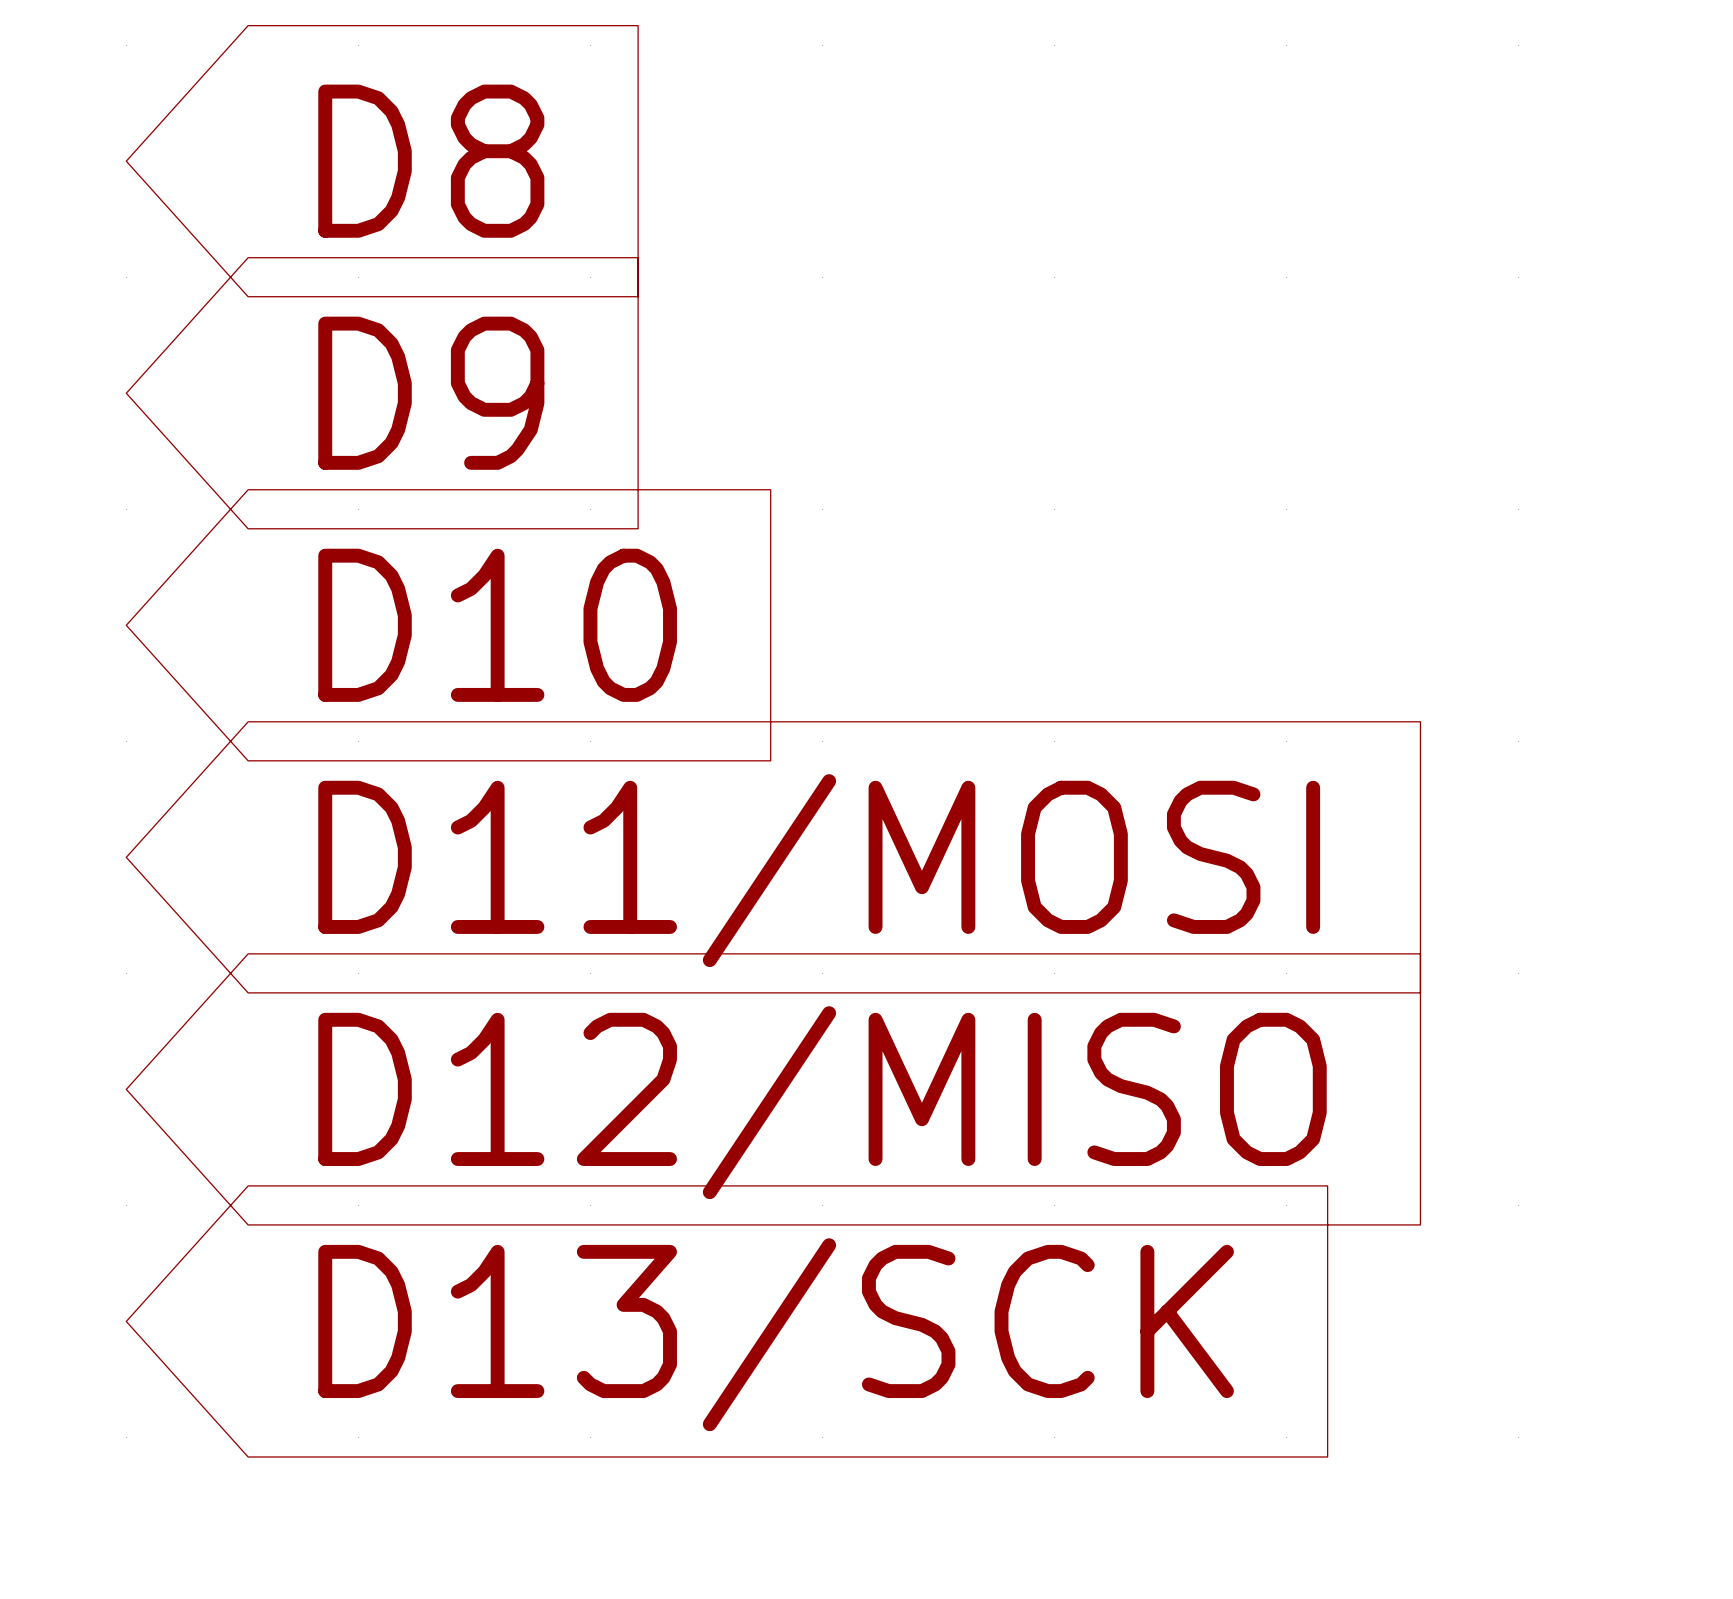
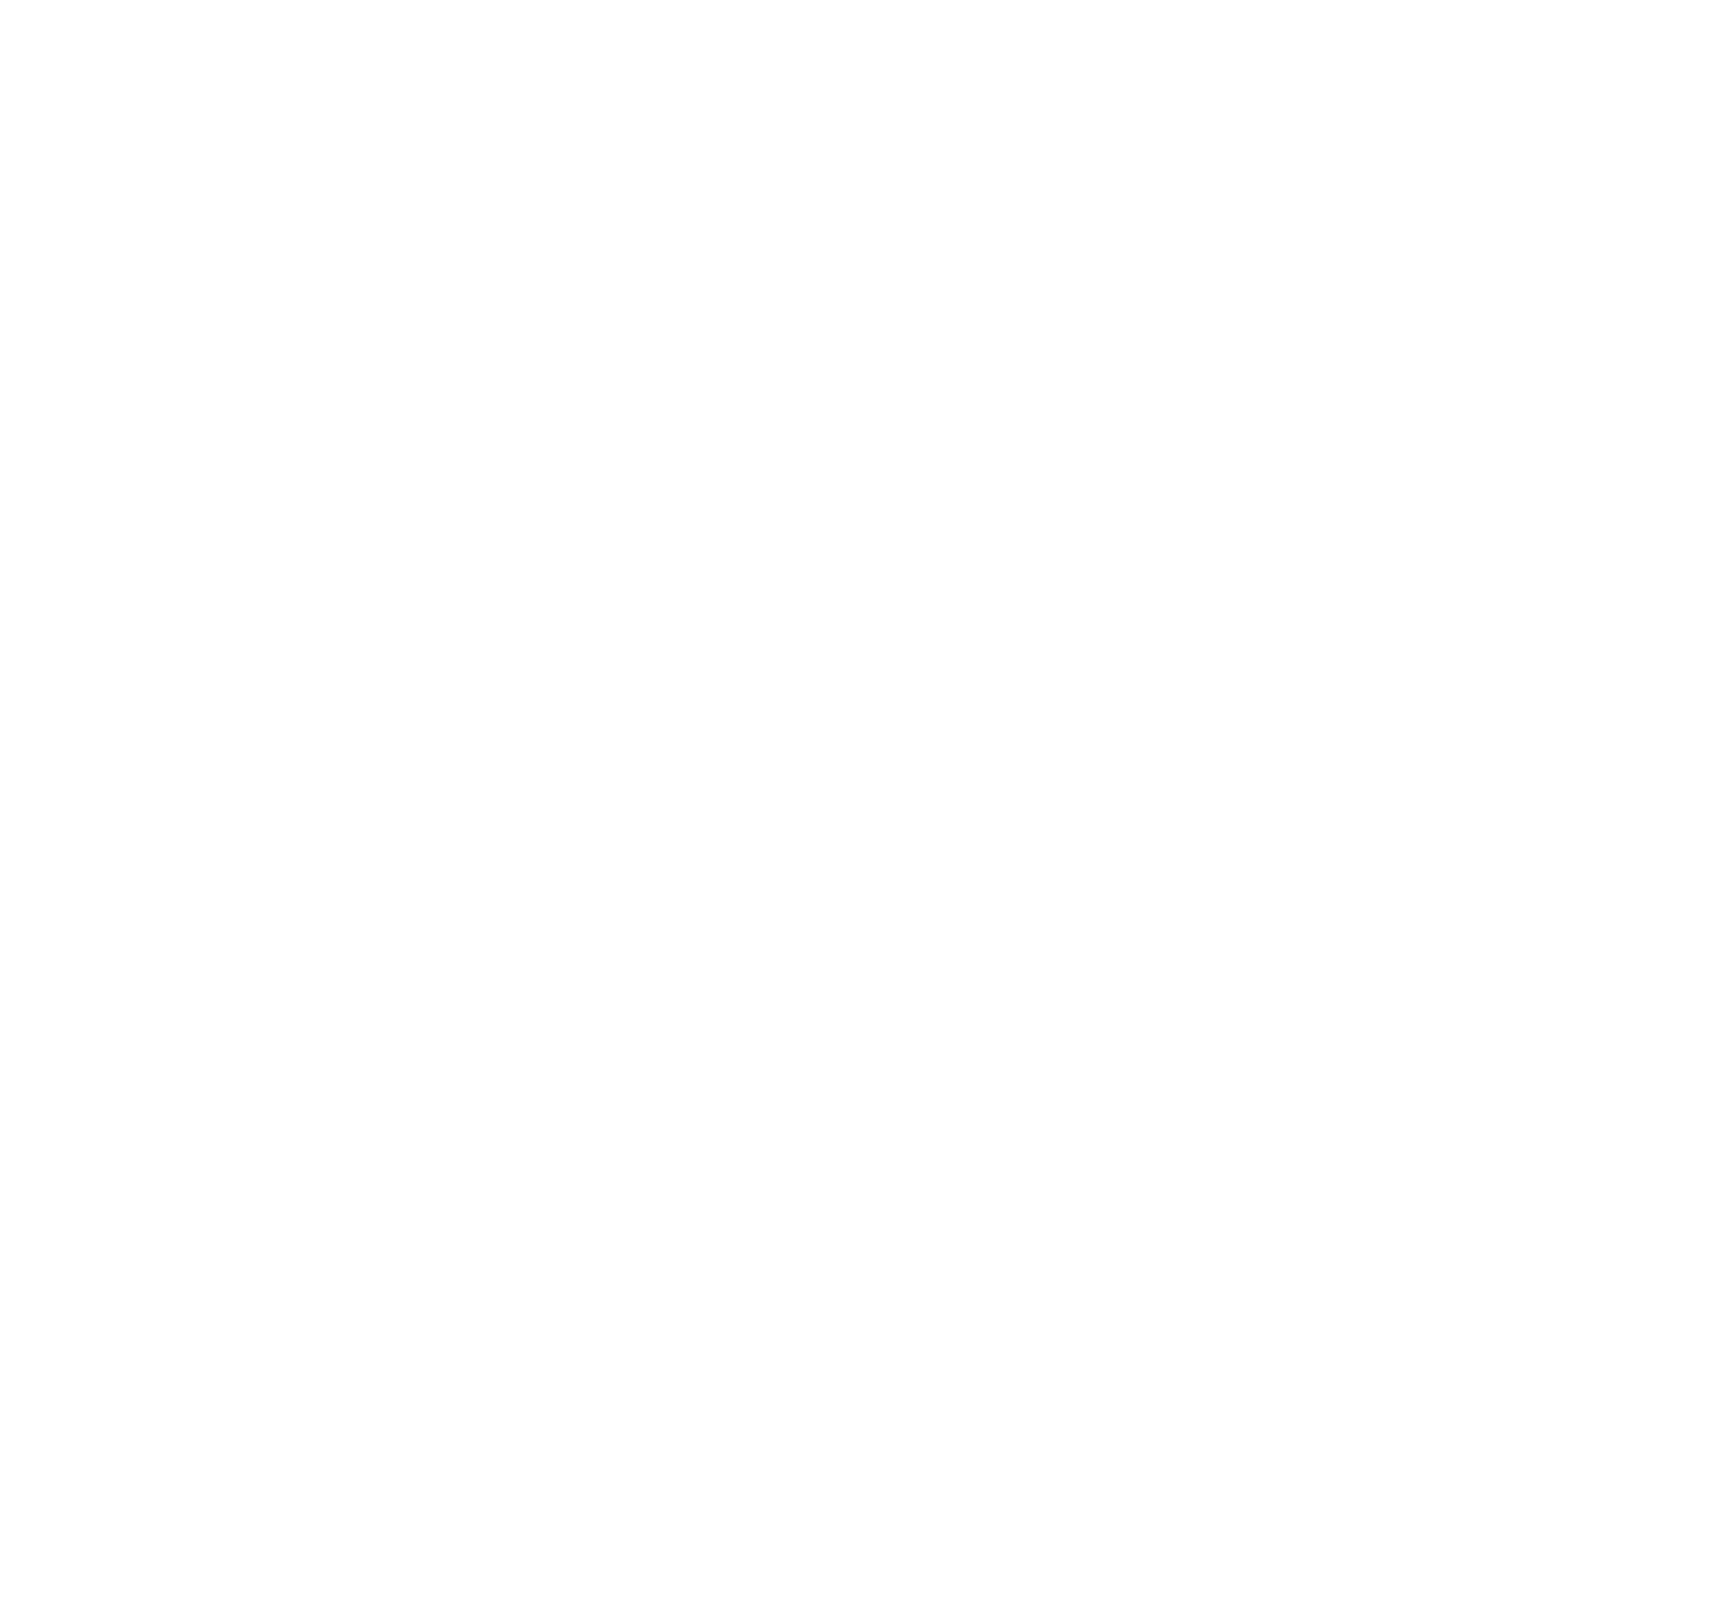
global label: D8 (431, 161) -> none
global label: D9 (431, 393) -> none
global label: D10 (497, 625) -> none
global label: D11/MOSI (819, 870) -> none
global label: D12/MISO (822, 1102) -> none
global label: D13/SCK (776, 1334) -> none

